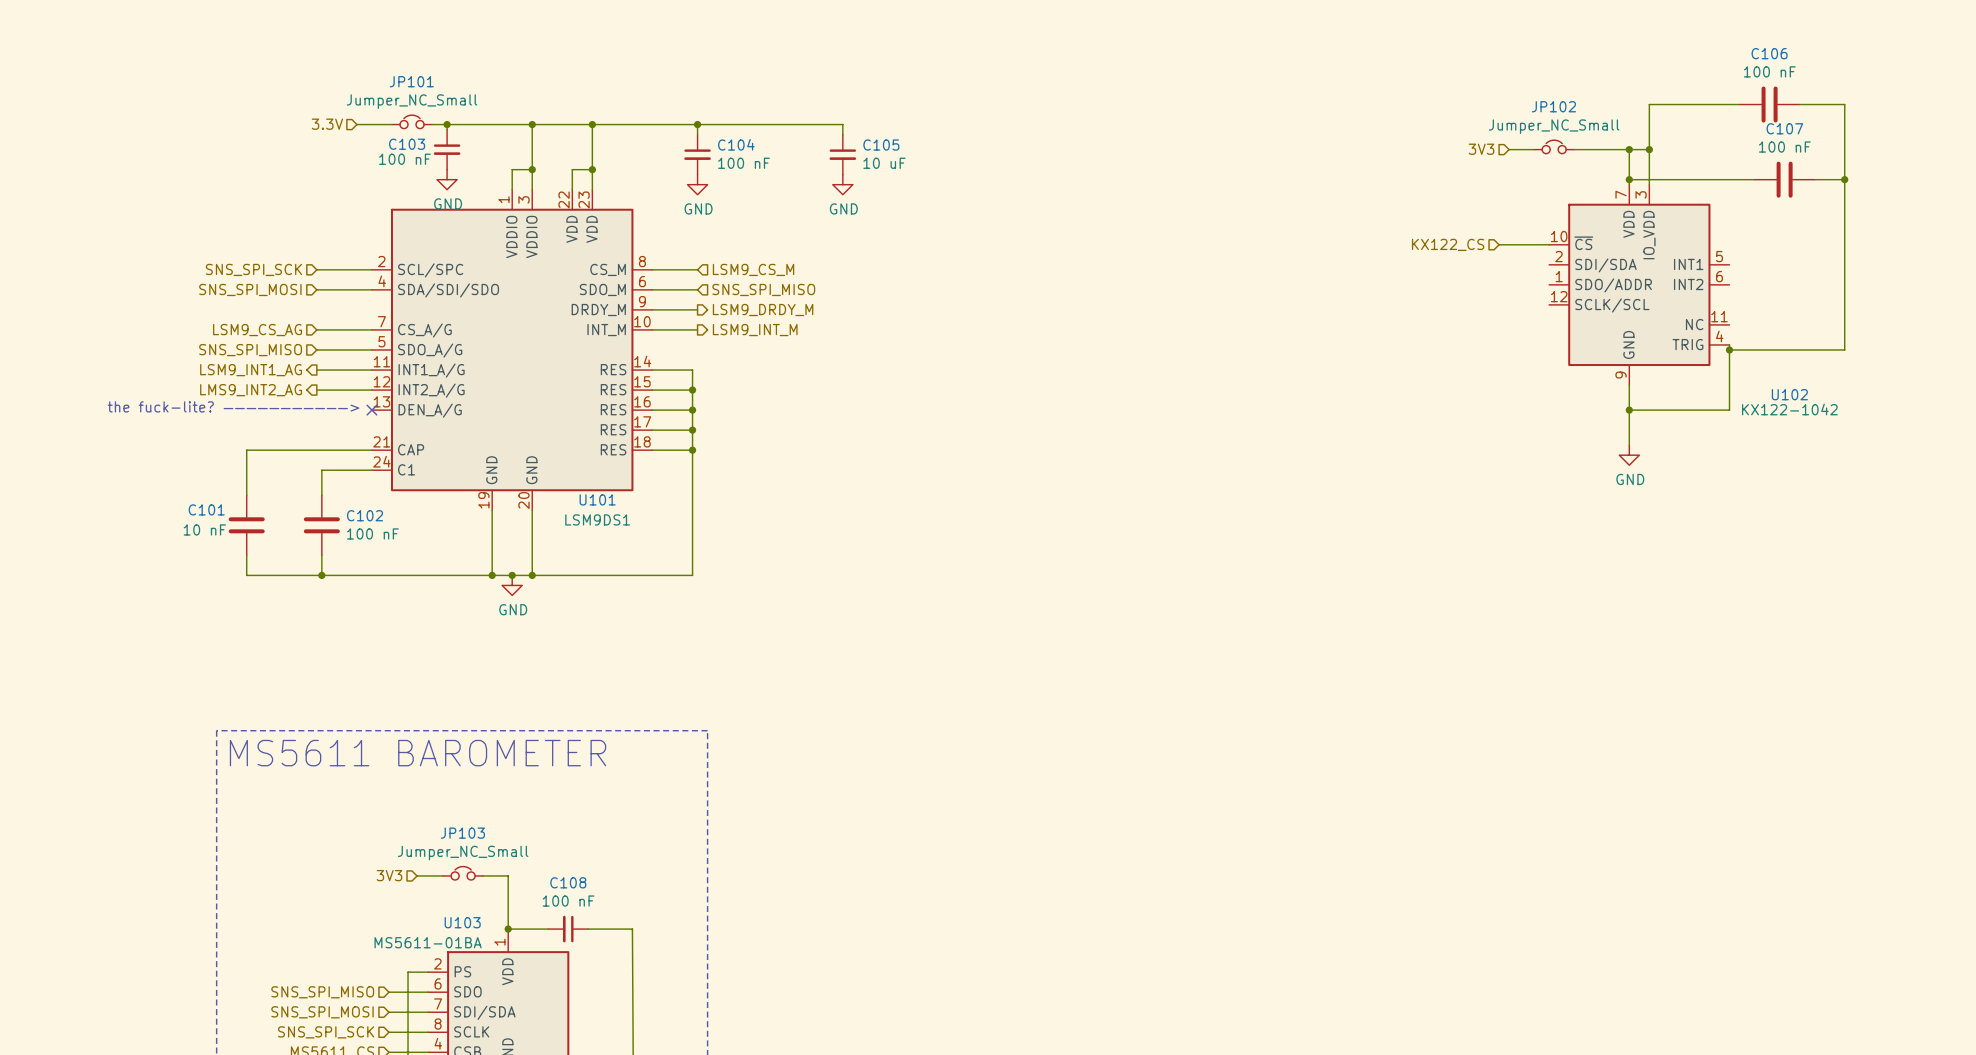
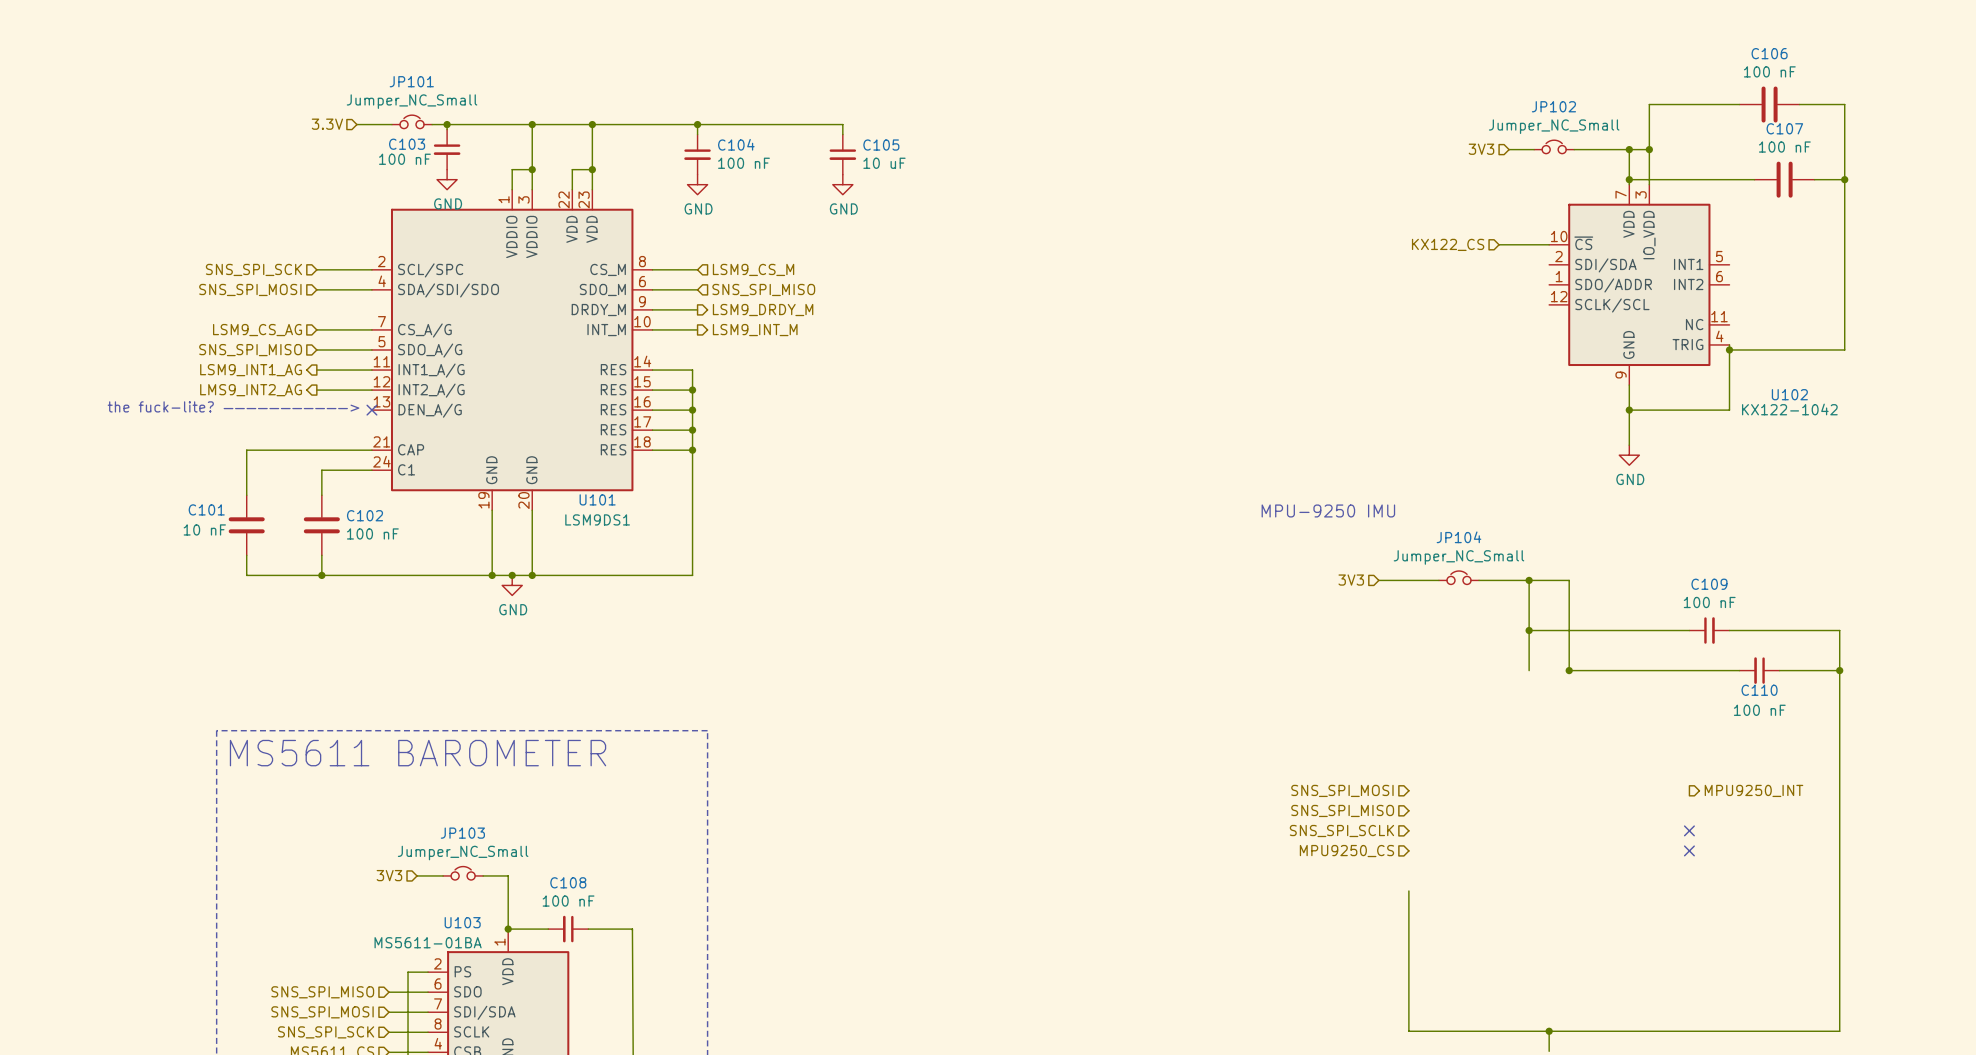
text: none -> MPU-9250 IMU (1328, 510)
JP104: none -> Jumper_NC_Small (1458, 577)
hierarchical label: none -> 3V3 (1351, 580)
wire: none -> (1378, 580) (1438, 580)
wire: none -> (1479, 580) (1569, 580) (1569, 670) (1739, 670)
wire: none -> (1529, 580) (1529, 670)
junction: none -> (1529, 580)
wire: none -> (1529, 630) (1689, 630)
junction: none -> (1529, 630)
C109: none -> 100 nF (1709, 630)
wire: none -> (1729, 630) (1839, 630) (1839, 1031) (1408, 1031) (1408, 891)
junction: none -> (1569, 670)
C110: none -> 100 nF (1759, 670)
wire: none -> (1779, 670) (1839, 670)
junction: none -> (1839, 670)
hierarchical label: none -> SNS_SPI_MOSI (1342, 790)
hierarchical label: none -> MPU9250_INT (1753, 790)
hierarchical label: none -> SNS_SPI_MISO (1342, 810)
hierarchical label: none -> SNS_SPI_SCLK (1341, 830)
no-connect mark: none -> (1689, 830)
no-connect mark: none -> (1689, 850)
hierarchical label: none -> MPU9250_CS (1346, 851)
wire: none -> (1549, 1031) (1549, 1051)
junction: none -> (1549, 1031)

